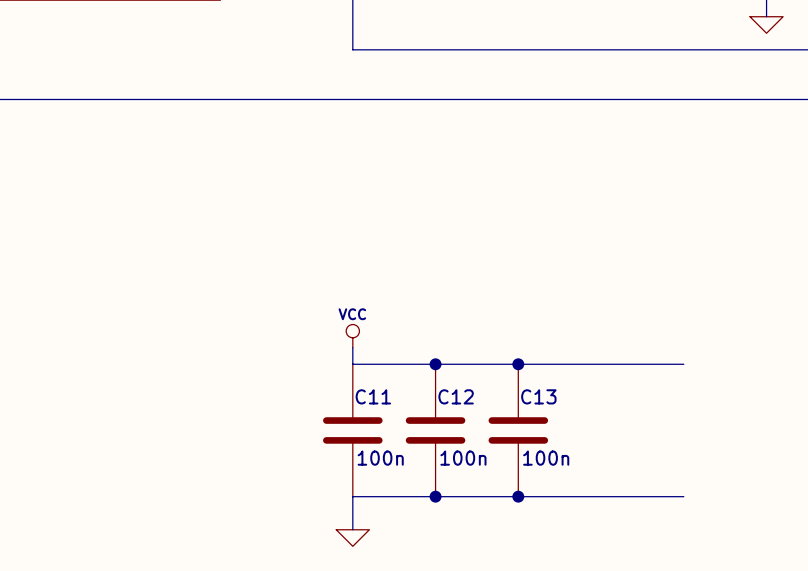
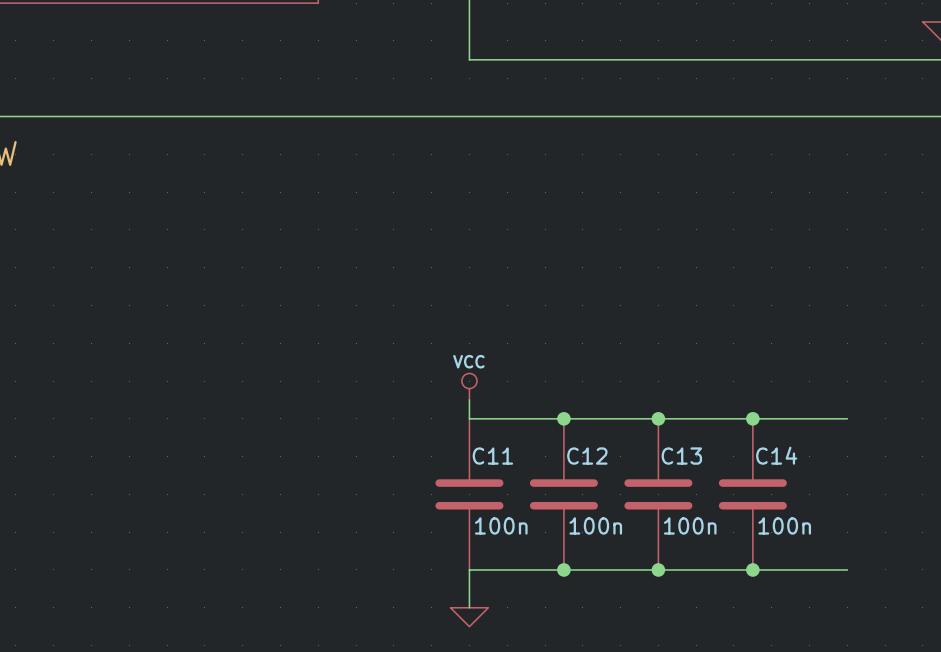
junction: none -> (752, 418)
C14: none -> 100n (752, 494)
junction: none -> (752, 569)

